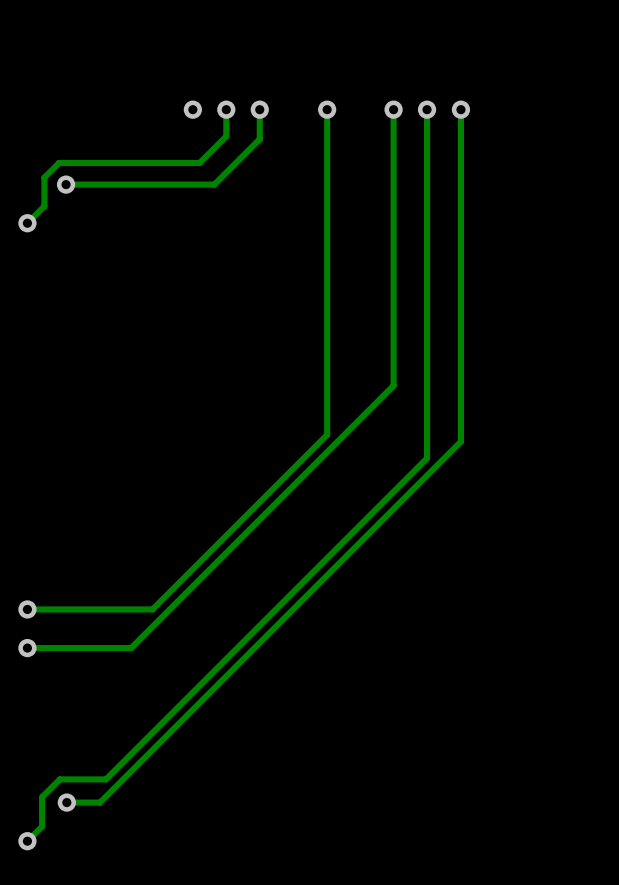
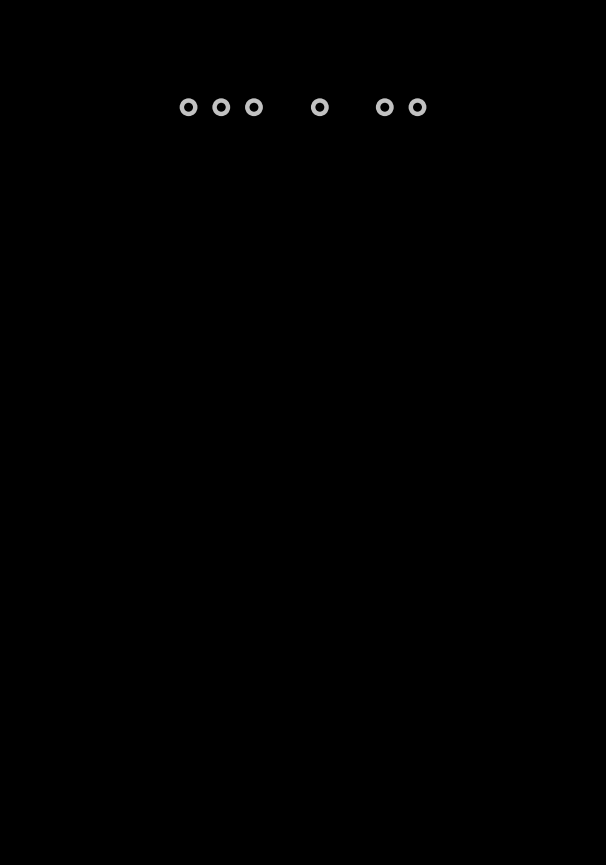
track: (226, 109) (226, 136) (199, 162) (59, 162) (44, 177) (44, 206) (27, 223) -> none
track: (259, 109) (259, 139) (214, 184) (66, 184) -> none
track: (327, 109) (327, 434) (152, 609) (27, 609) -> none
track: (393, 109) (393, 385) (131, 648) (27, 648) -> none
track: (427, 109) (427, 458) (106, 779) (59, 779) (42, 797) (42, 826) (27, 841) -> none
track: (460, 109) (460, 441) (100, 802) (66, 802) -> none
via: (460, 109) -> none
via: (66, 184) -> none
via: (27, 223) -> none
via: (27, 609) -> none
via: (27, 648) -> none
via: (66, 802) -> none
via: (27, 841) -> none

